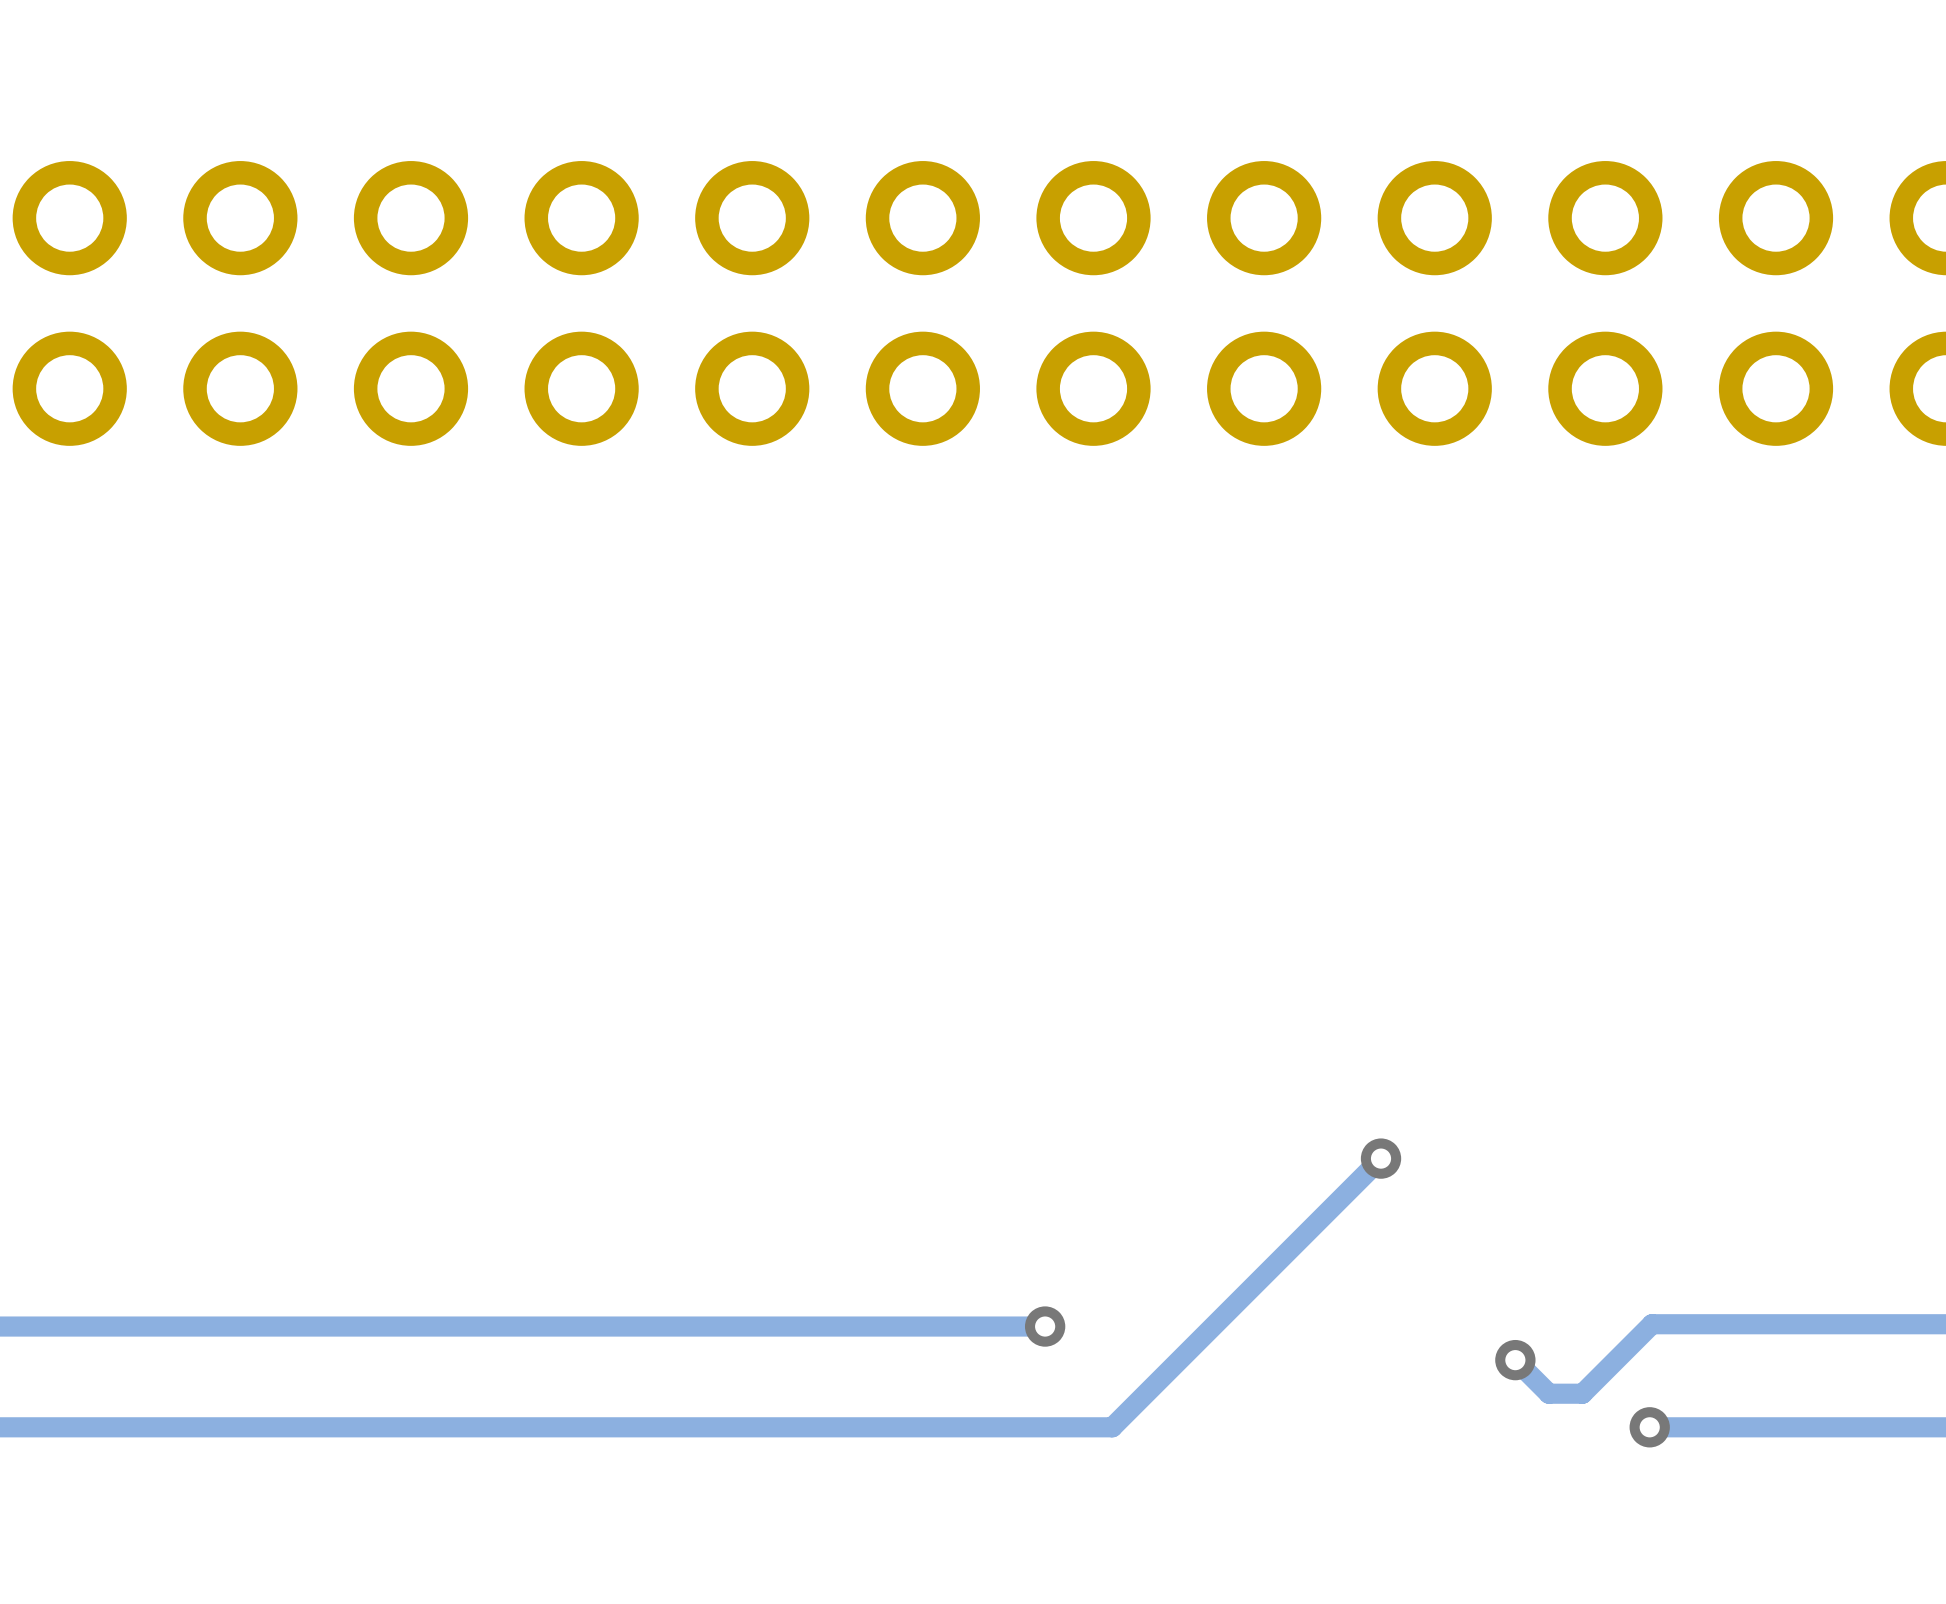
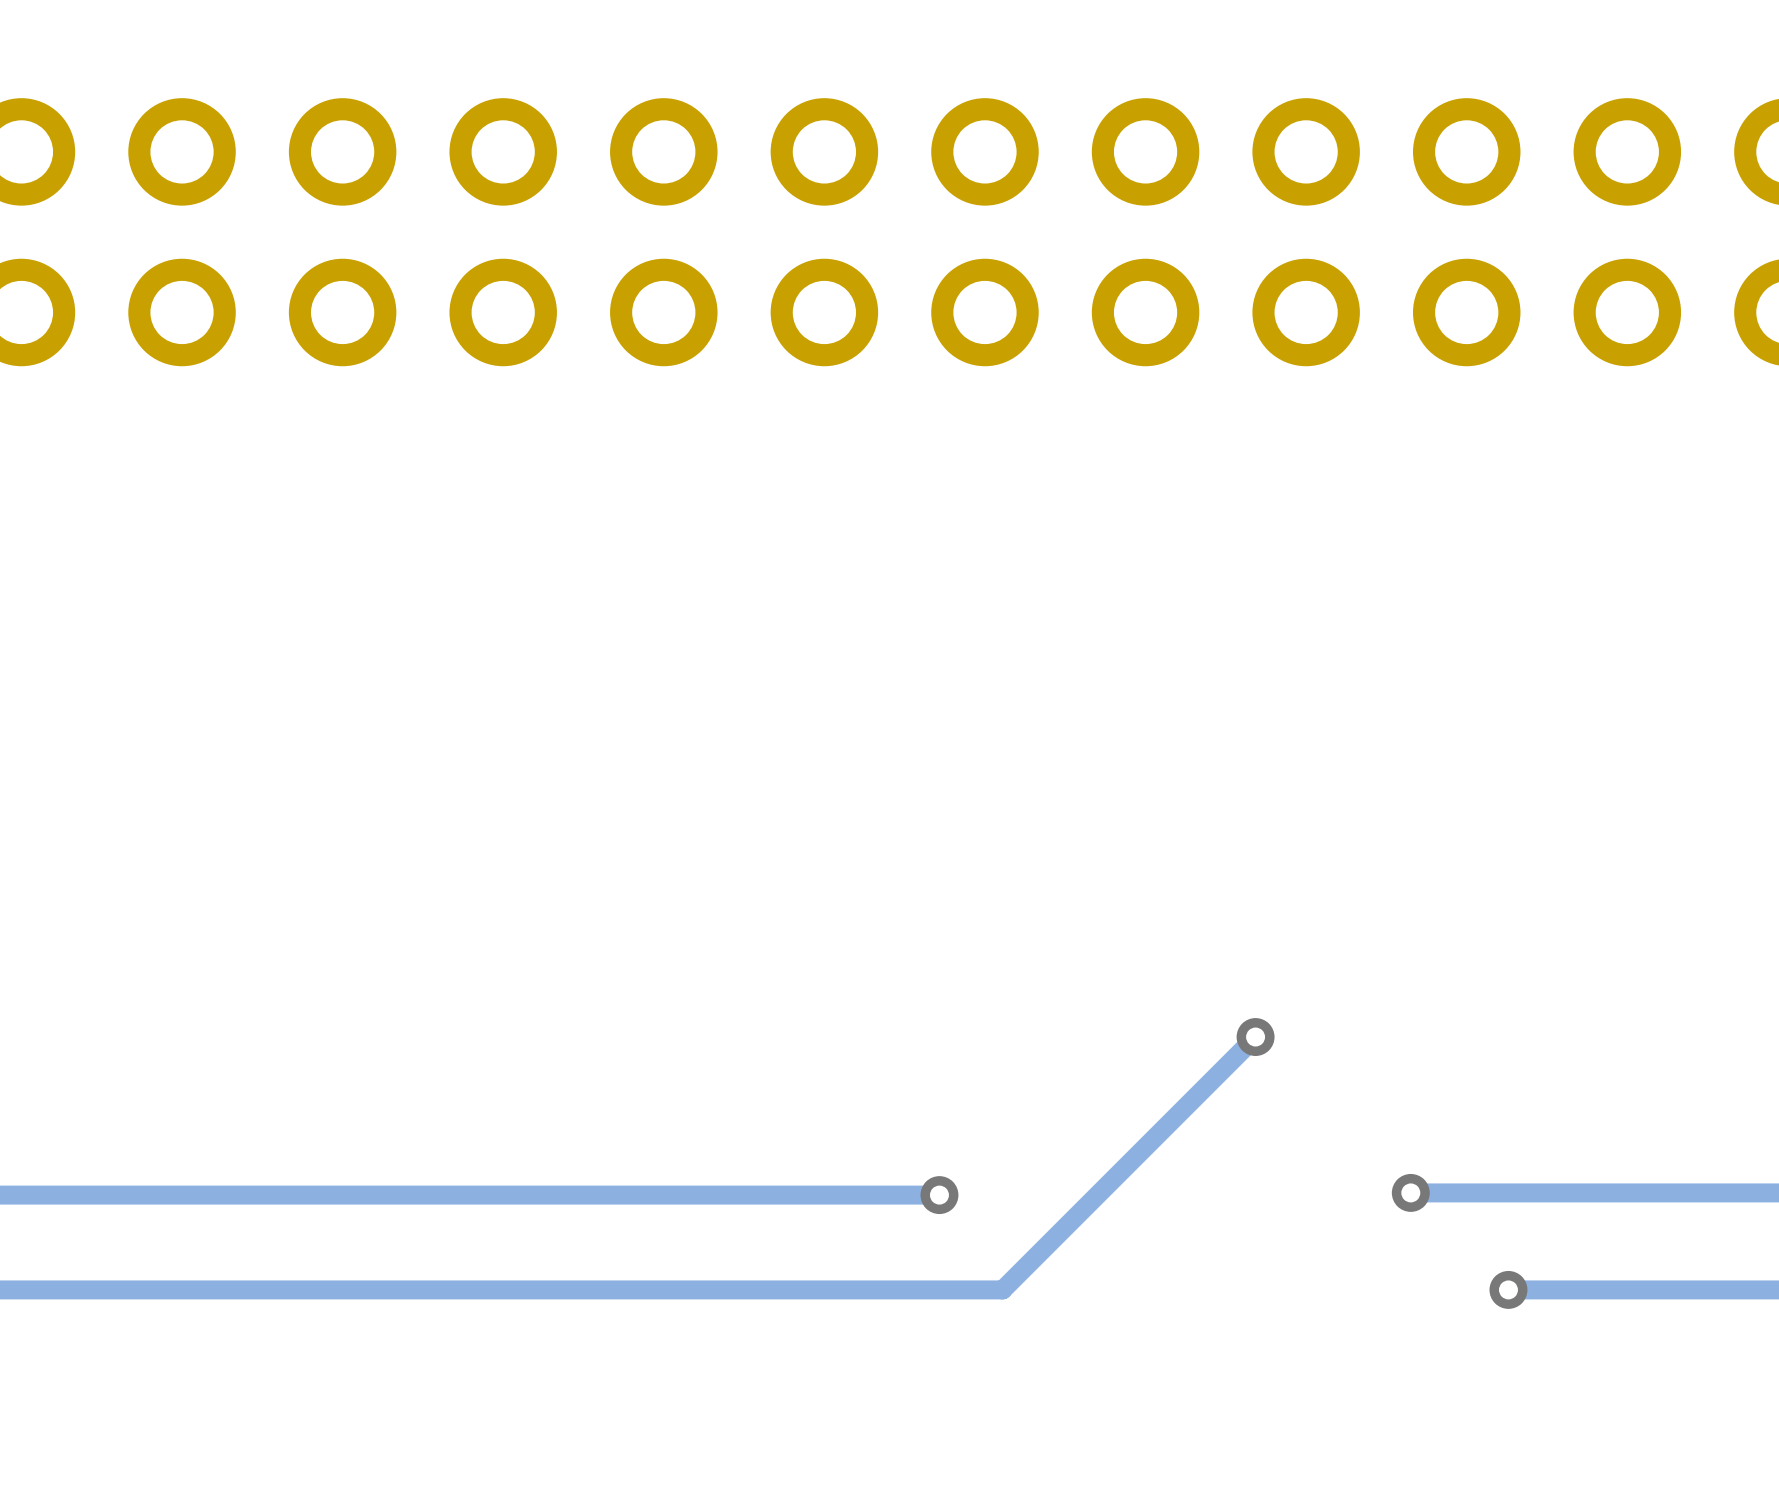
track: (1652, 1324) (1582, 1393) (1548, 1393) (1515, 1360) -> (1510, 1192) (1410, 1192)
via position: (1515, 1360) -> (1410, 1192)

